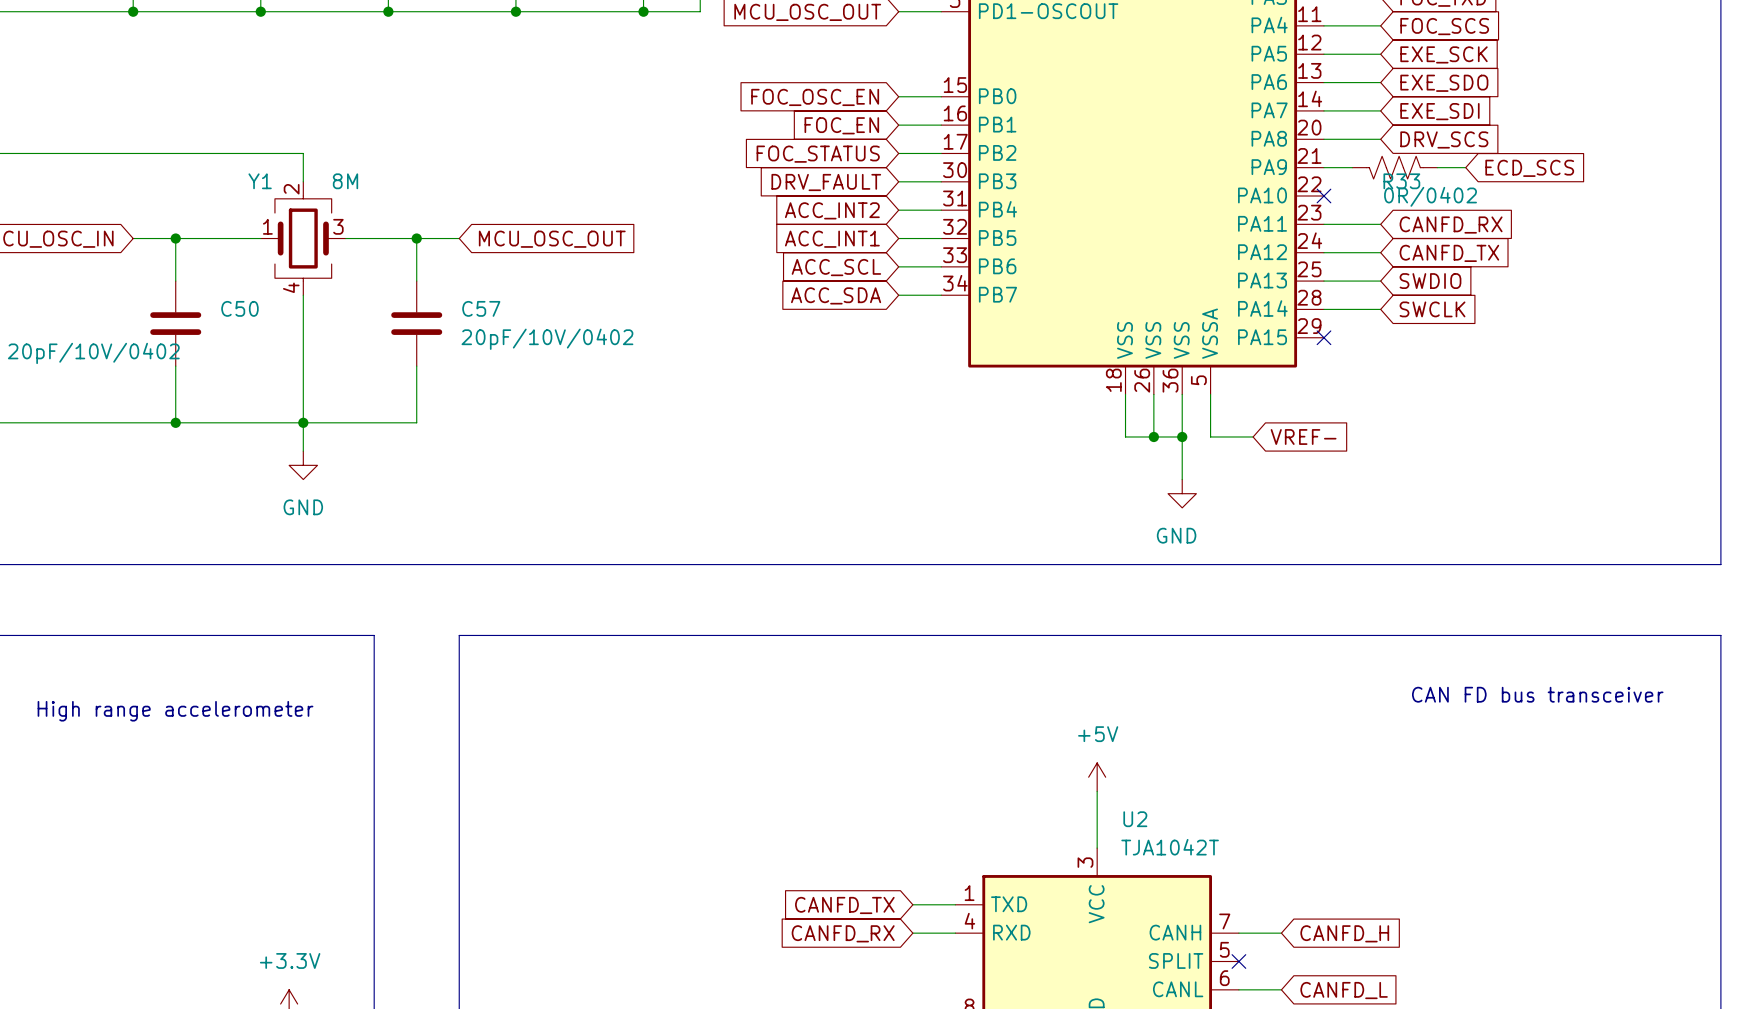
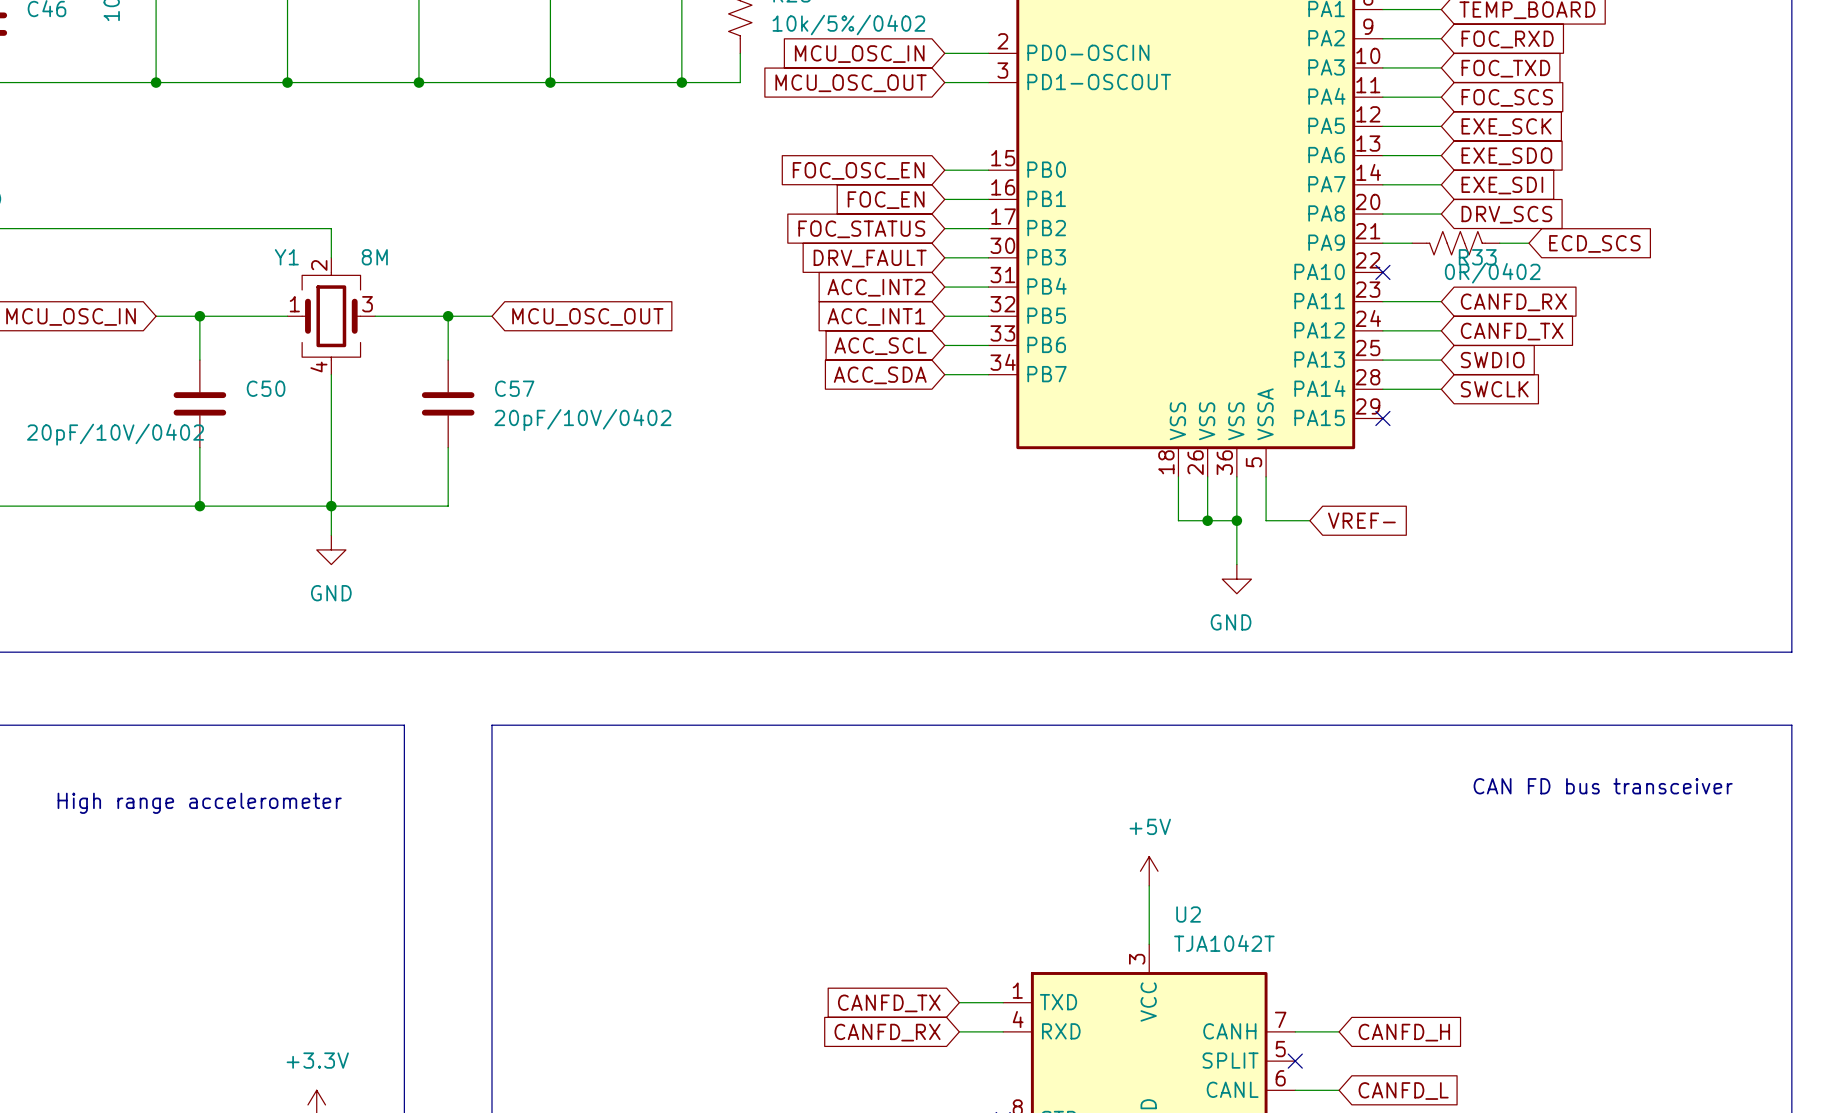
R33 name position: R33 (1401, 181) -> R33 (1477, 257)

